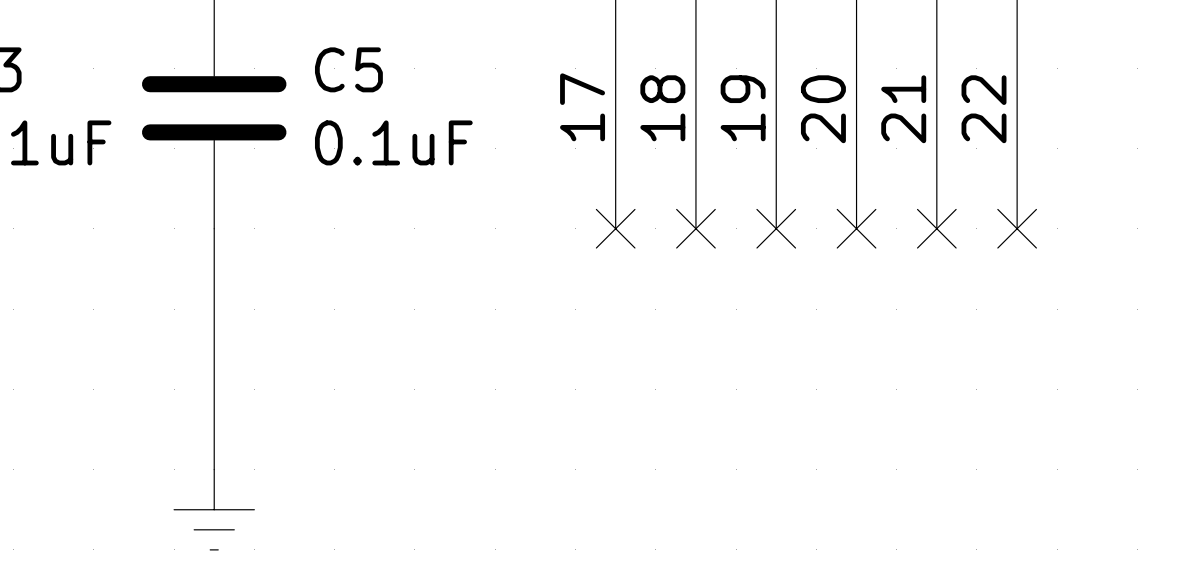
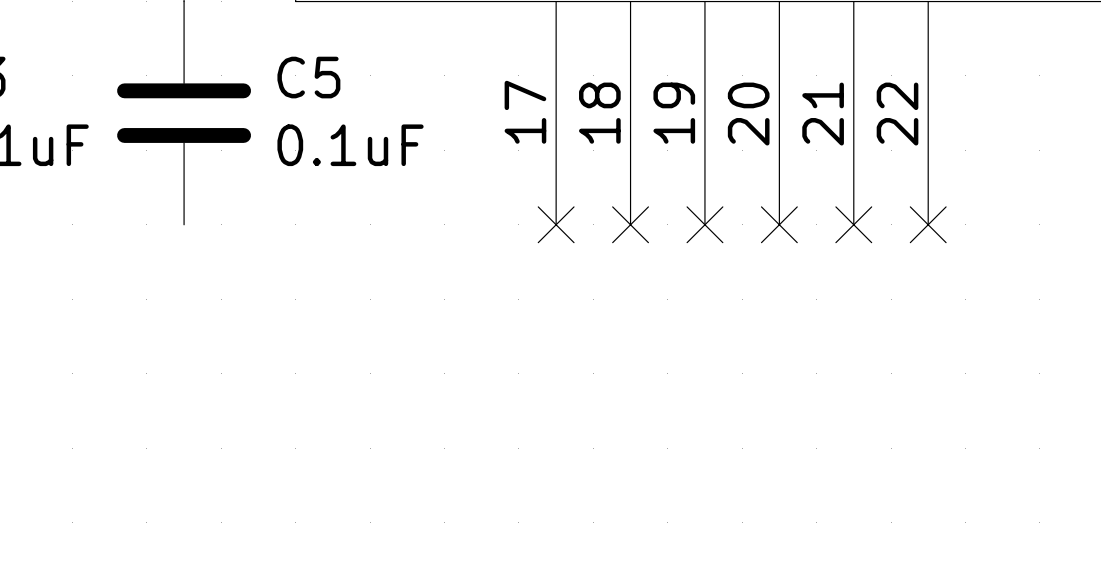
wire: (214, 228) (214, 469) -> none
power symbol: (214, 509) -> none

